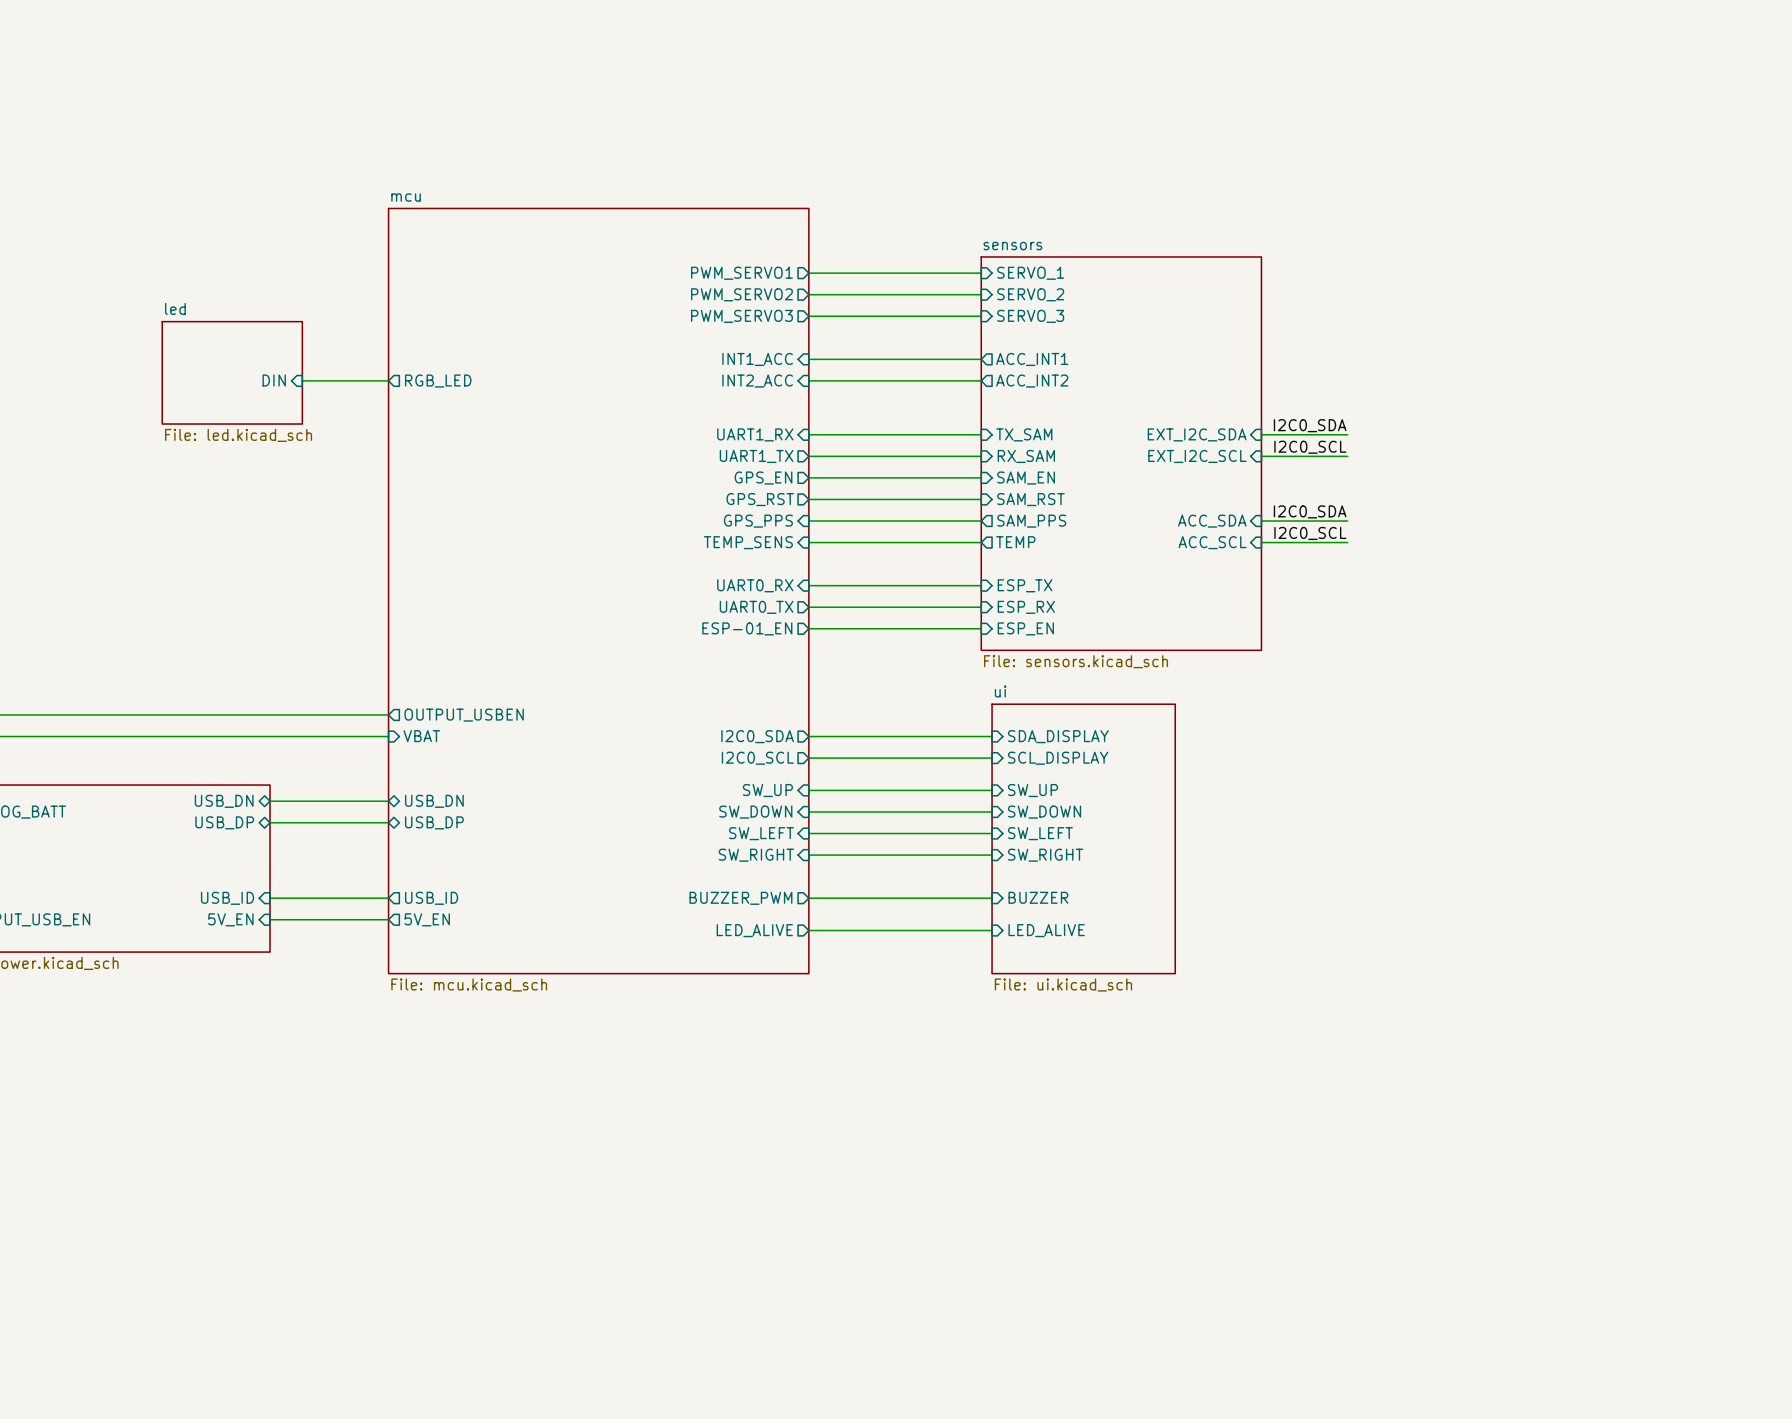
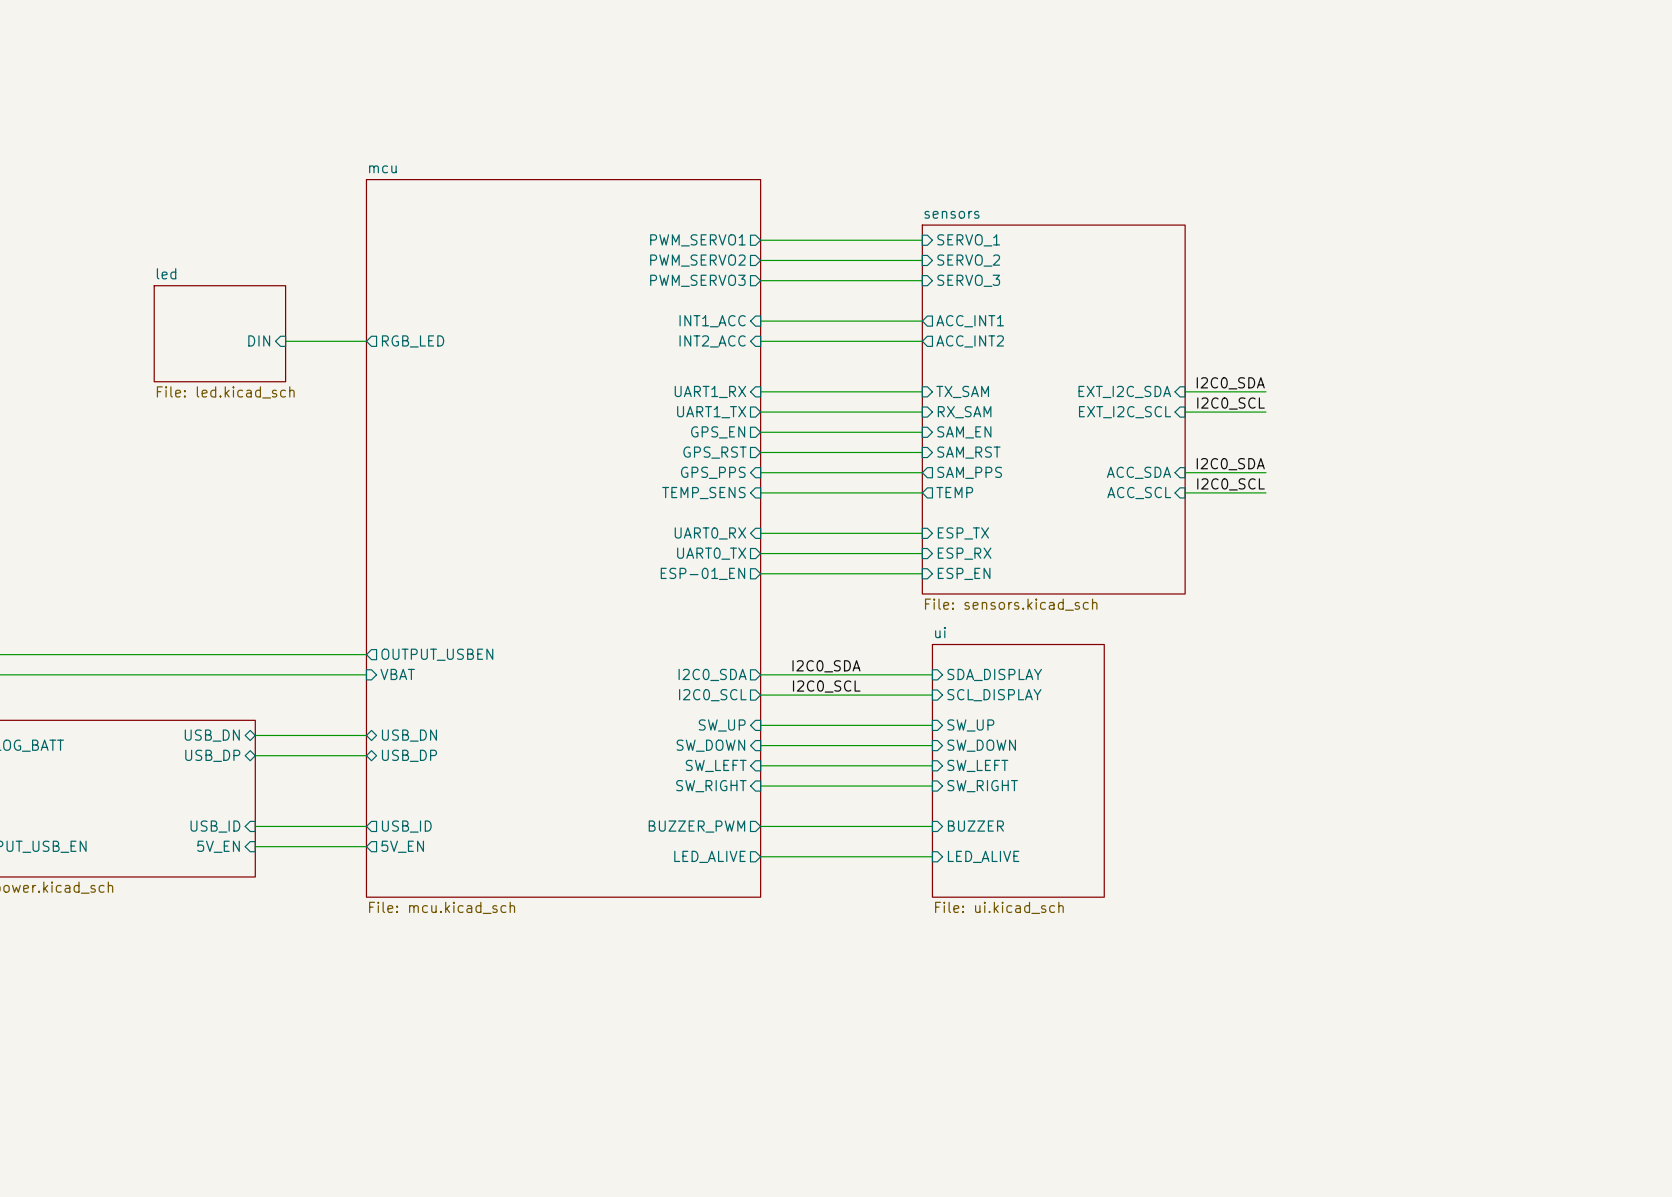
label: none -> I2C0_SDA (826, 666)
label: none -> I2C0_SCL (826, 686)

